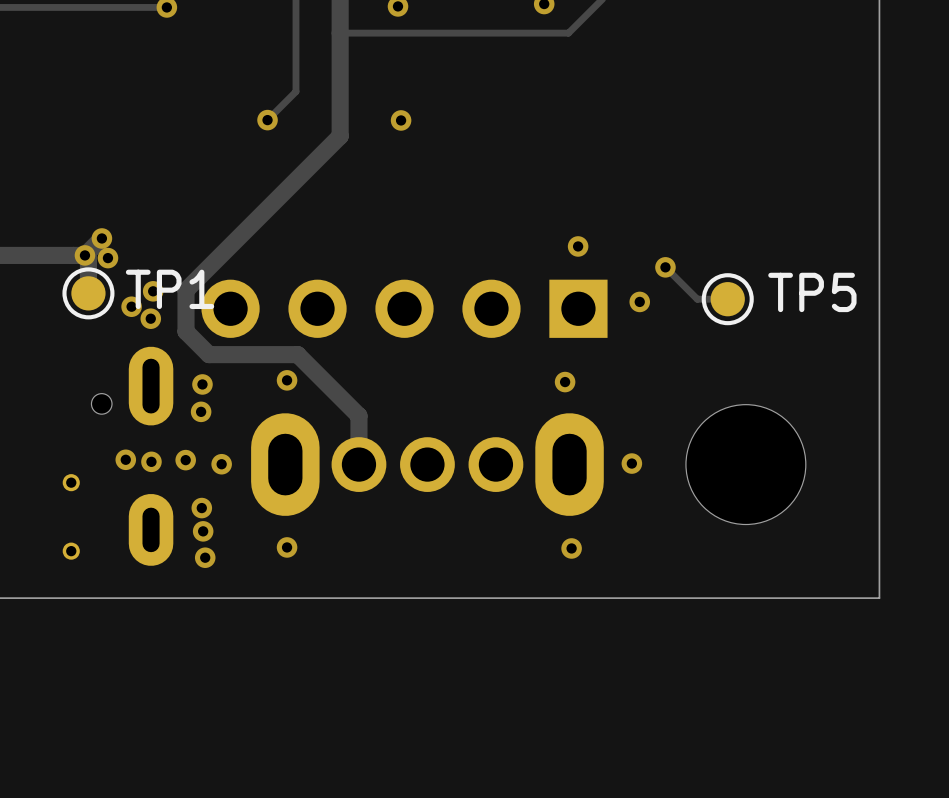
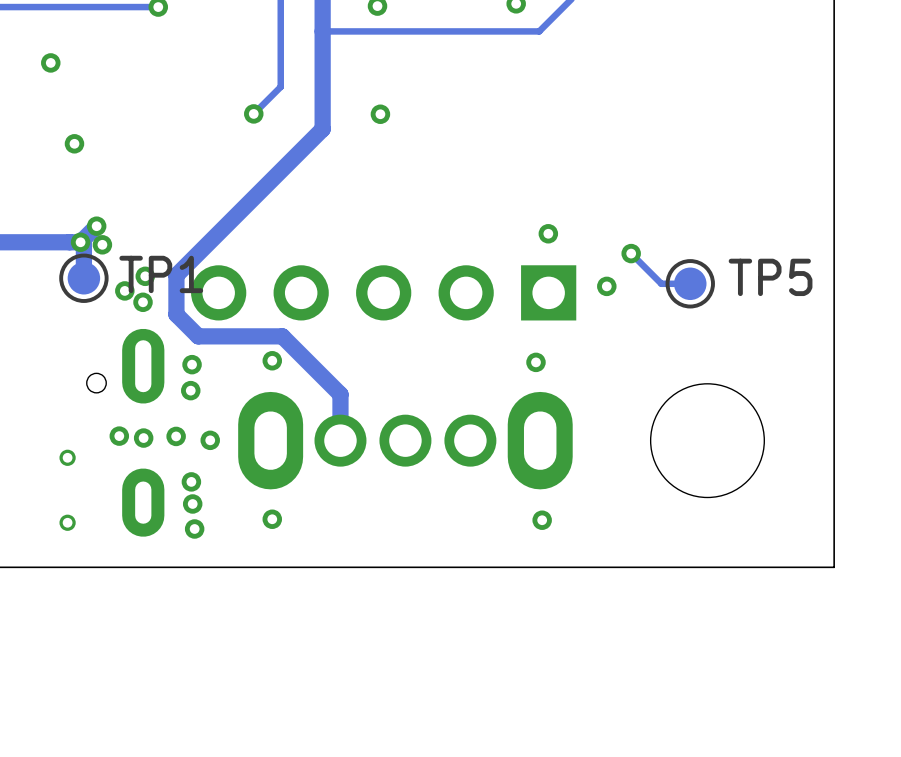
via: none -> (50, 62)
via: none -> (74, 143)
via: (631, 463) -> none

